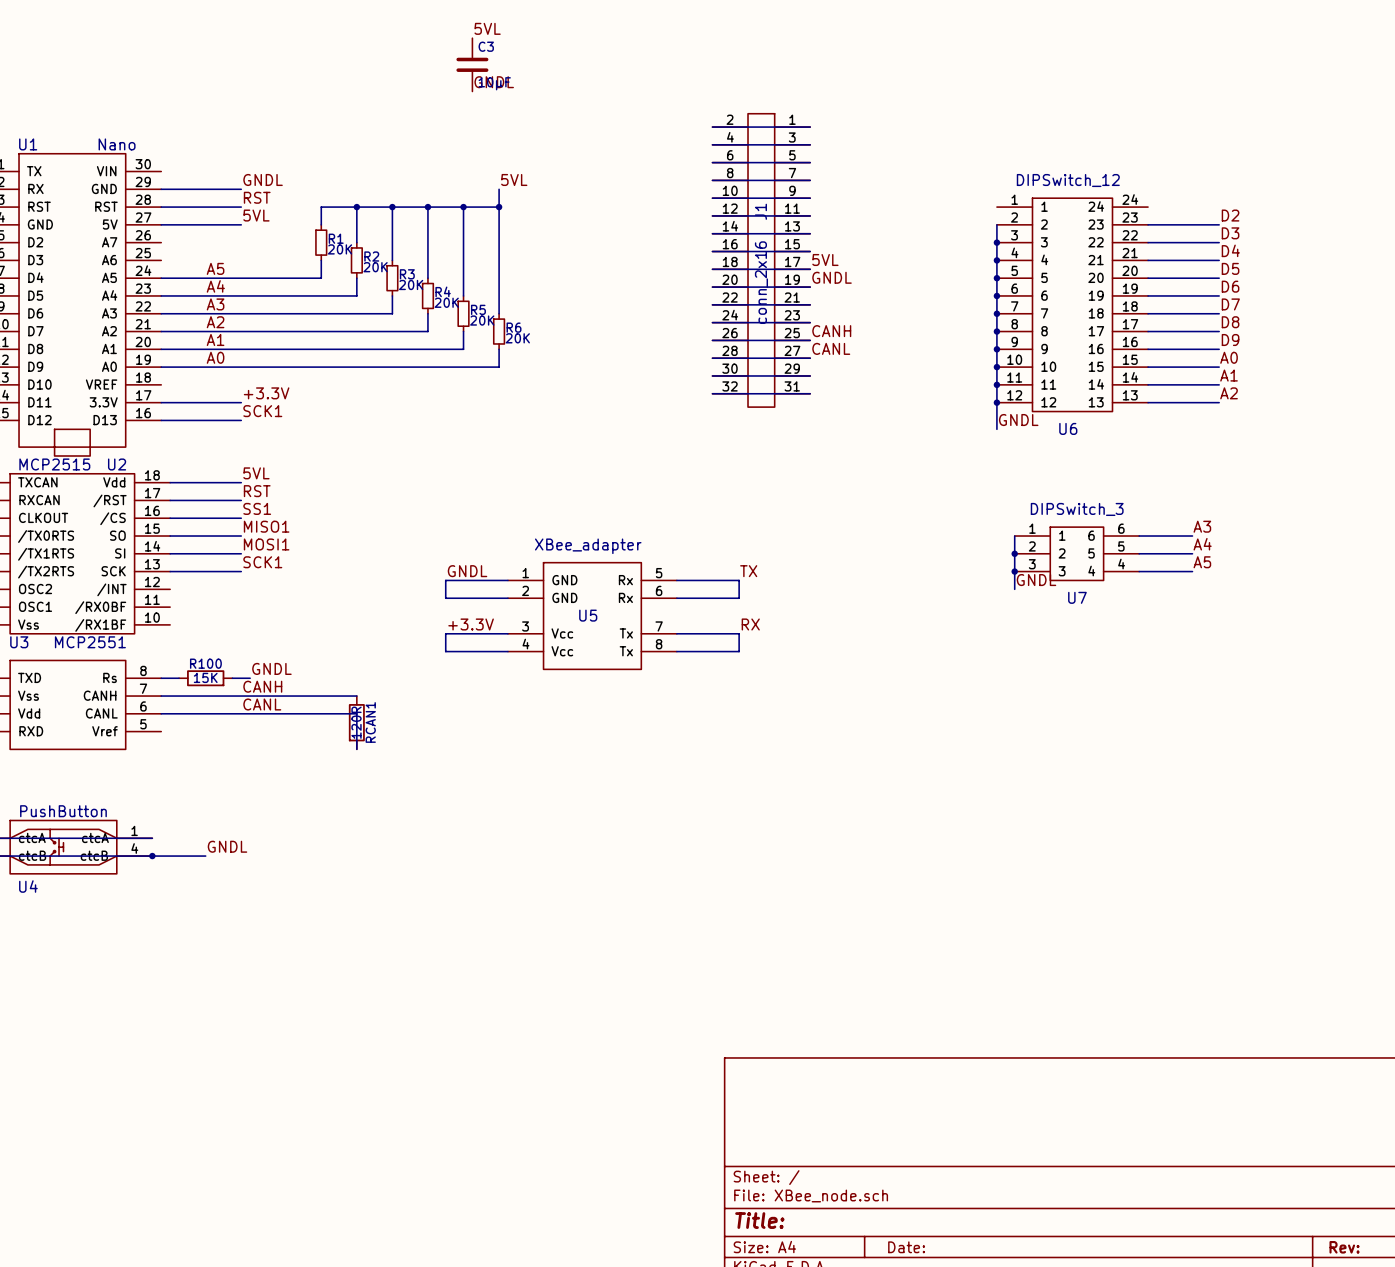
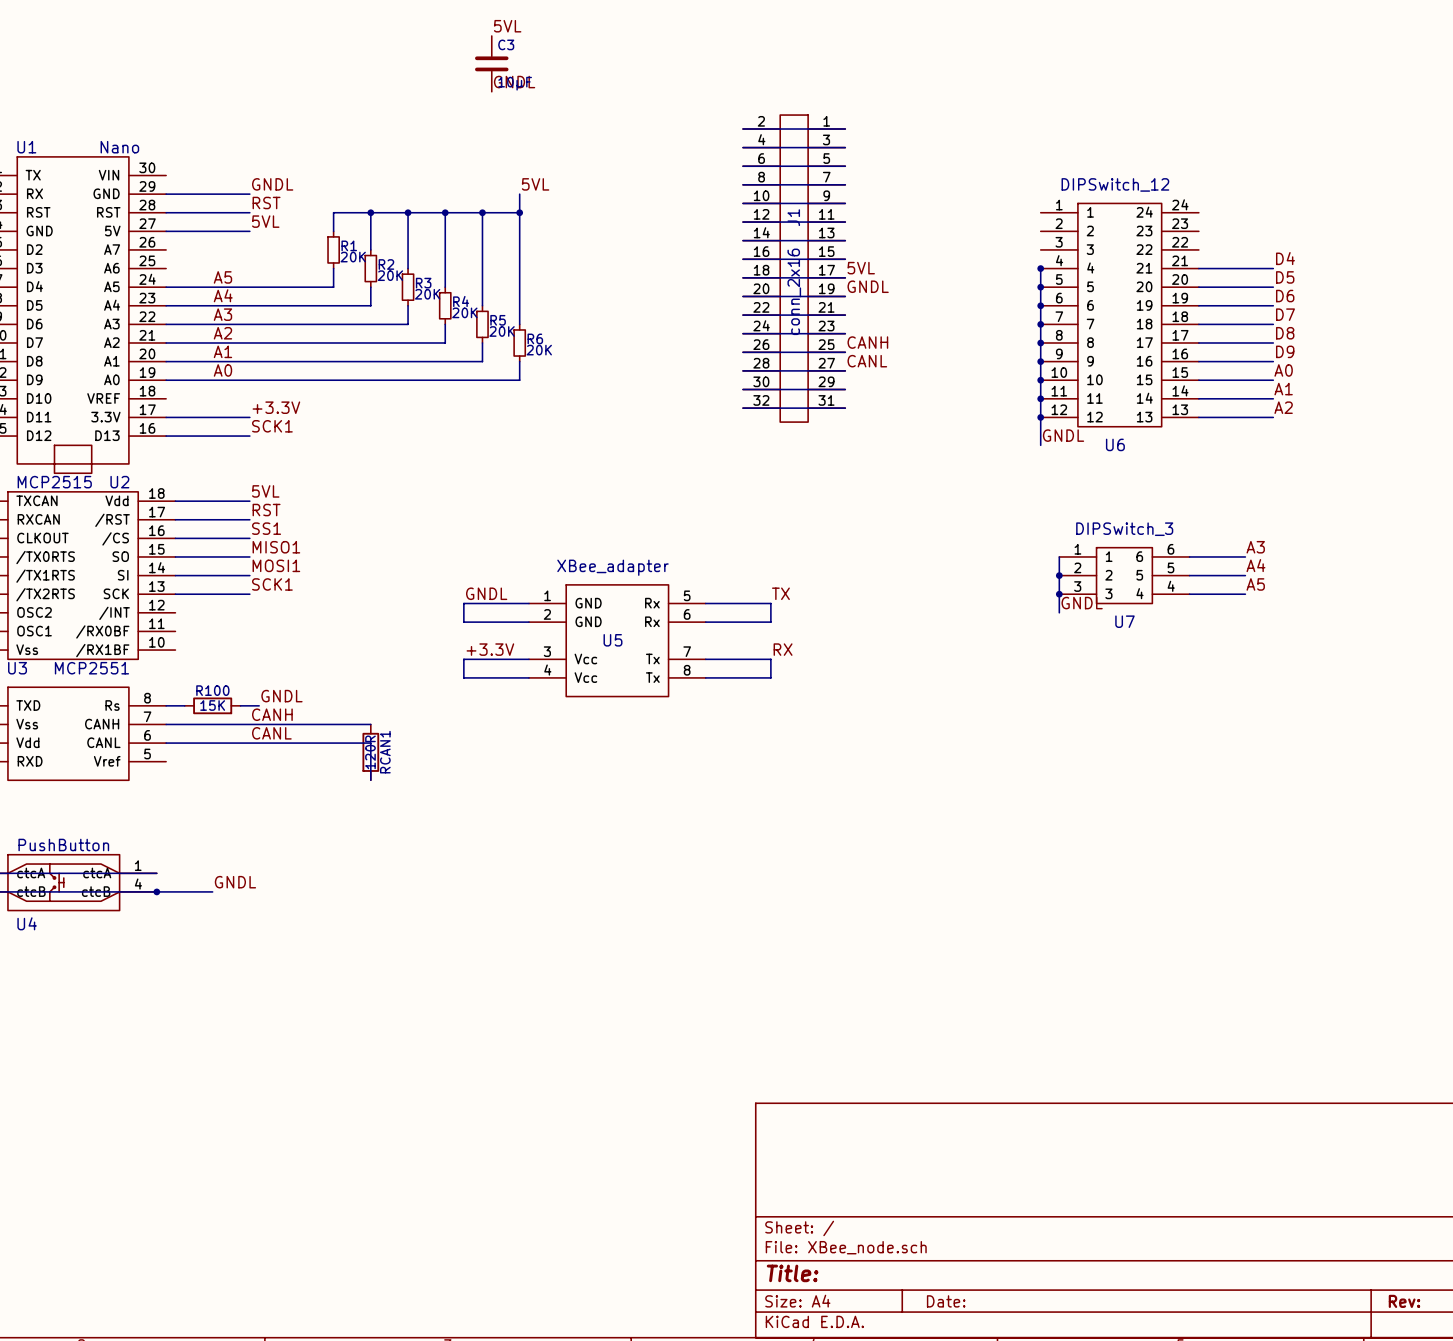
label: D2 (1230, 215) -> none
wire: (996, 224) (996, 260) -> none
wire: (1148, 224) (1219, 224) -> none
label: D3 (1230, 233) -> none
junction: (996, 242) -> none
wire: (1148, 242) (1219, 242) -> none

